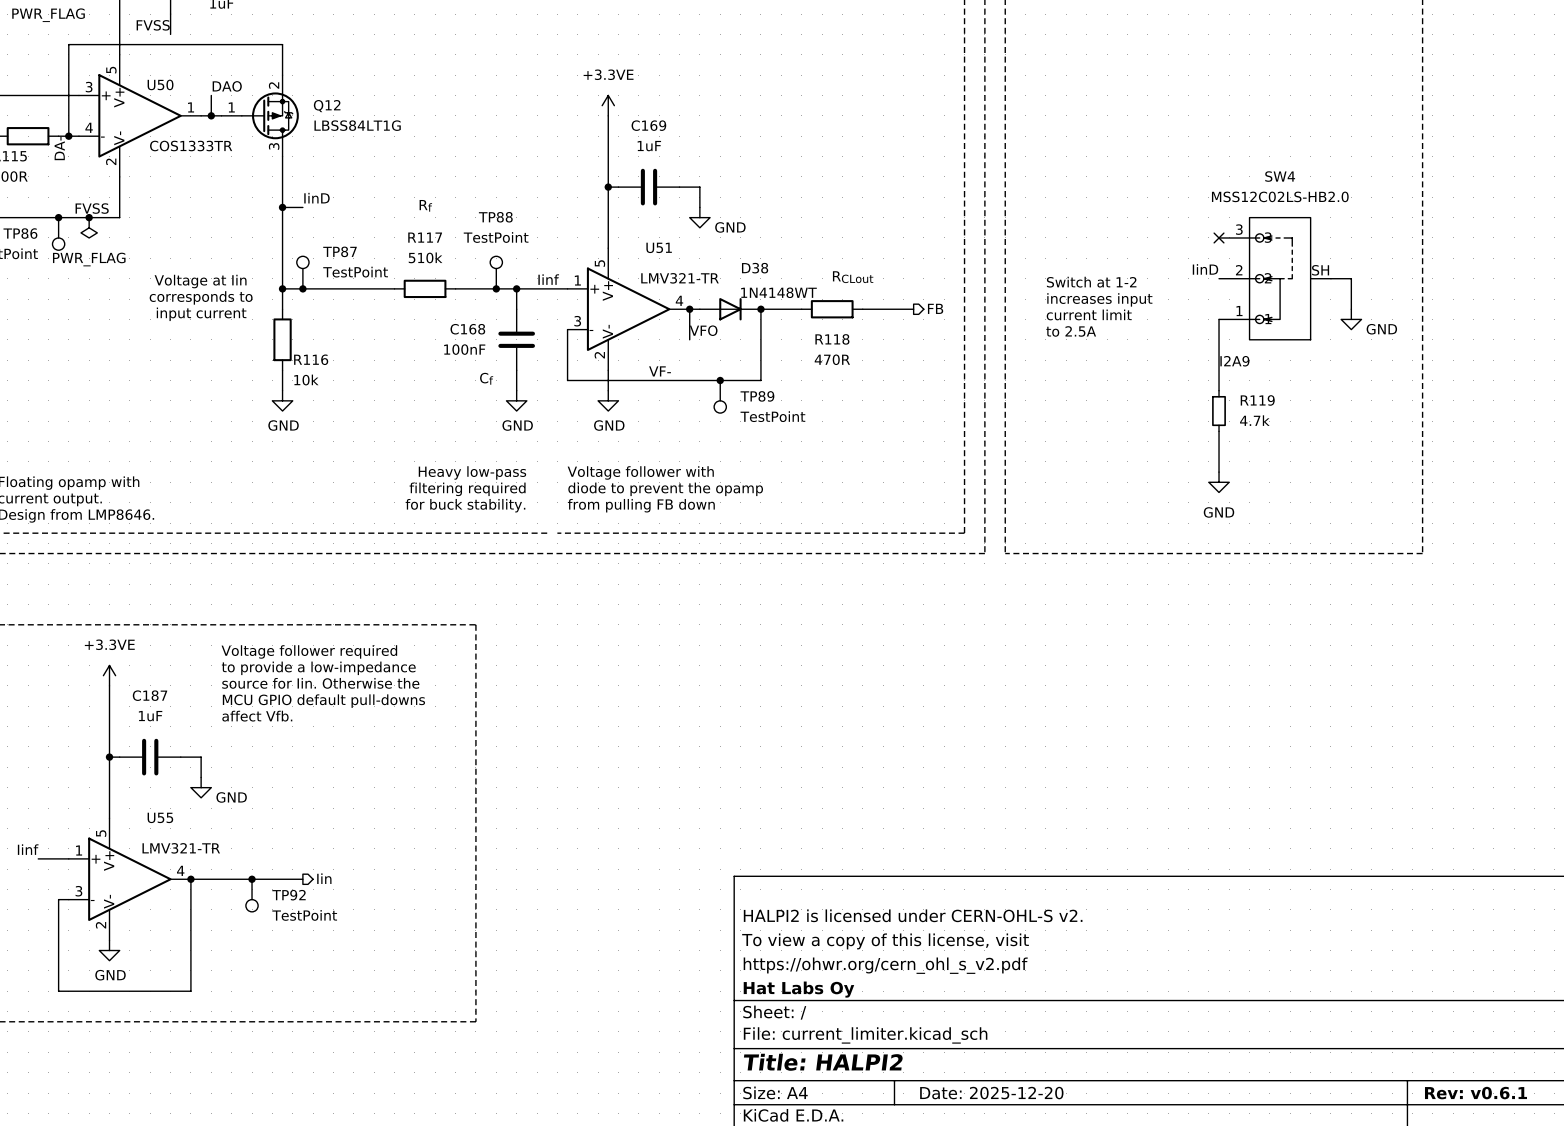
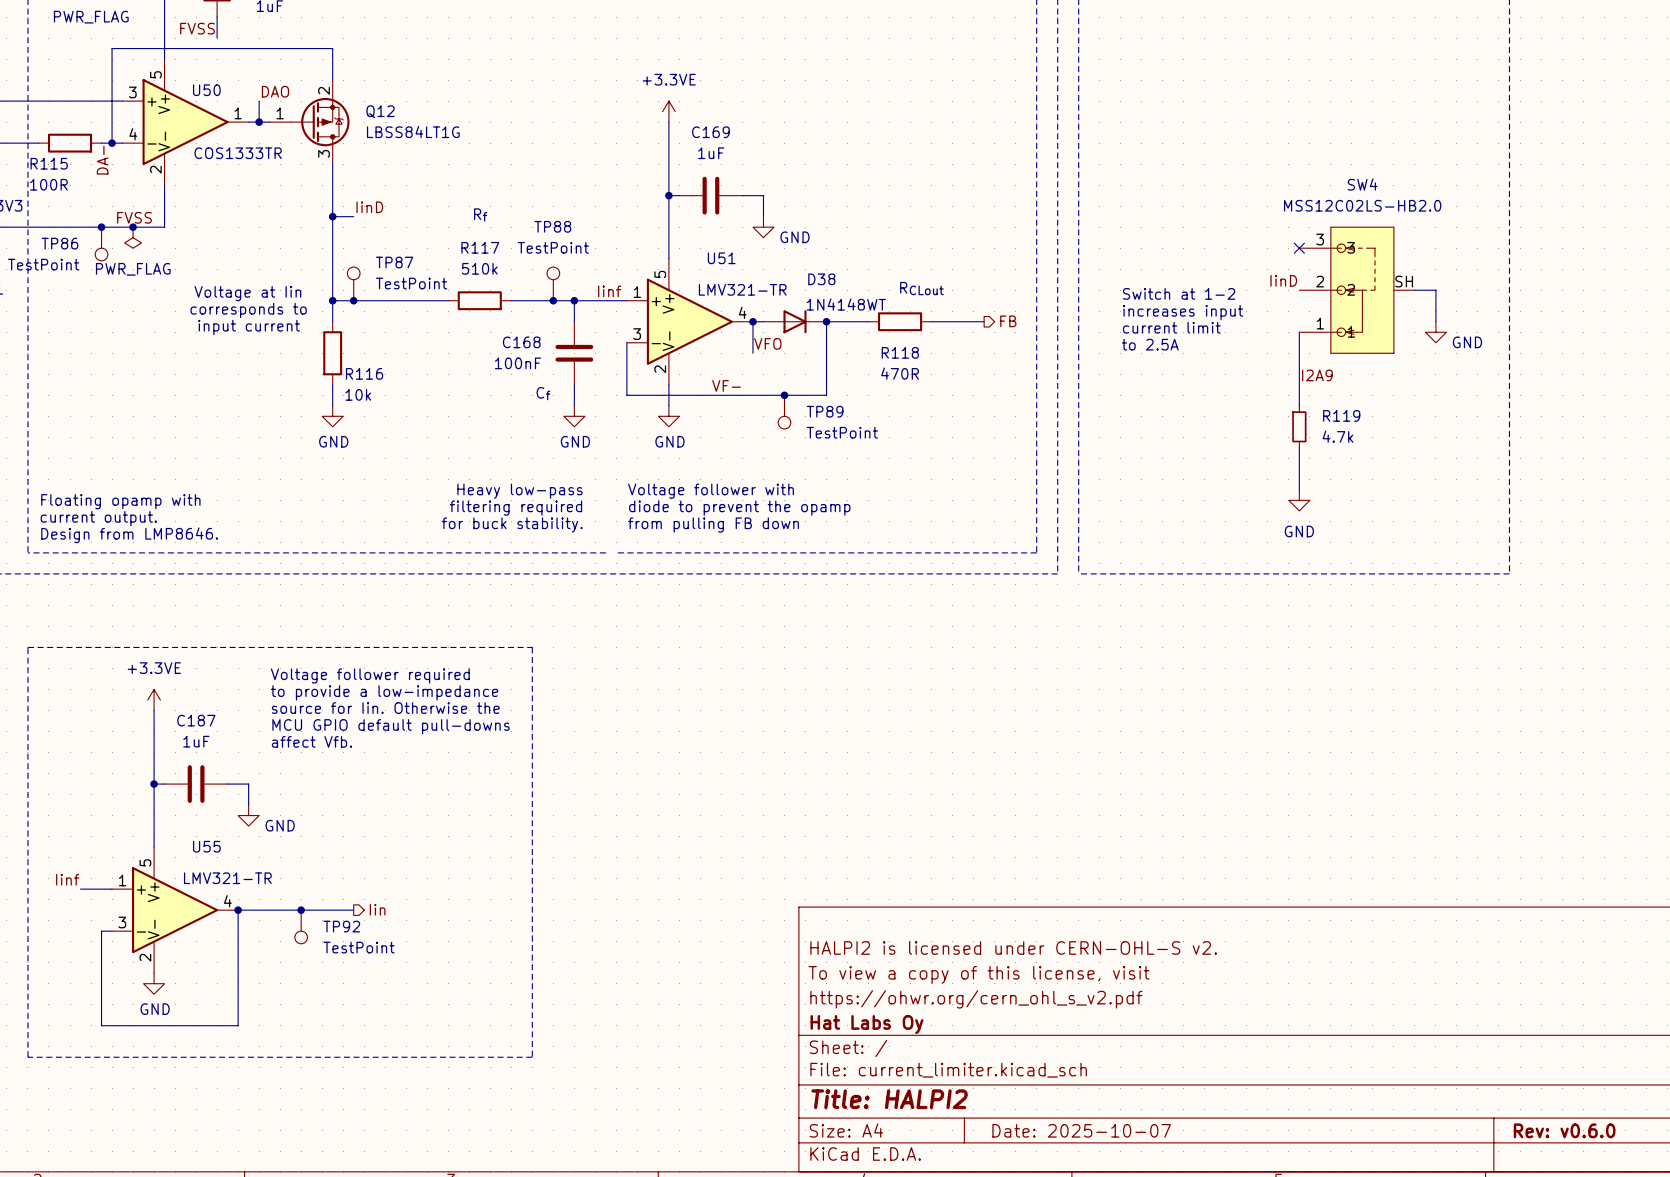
title block: Date: 2025-12-20 (991, 1093) -> Date: 2025-10-07 (1081, 1130)
title block: Rev: v0.6.1 (1475, 1093) -> Rev: v0.6.0 (1564, 1130)

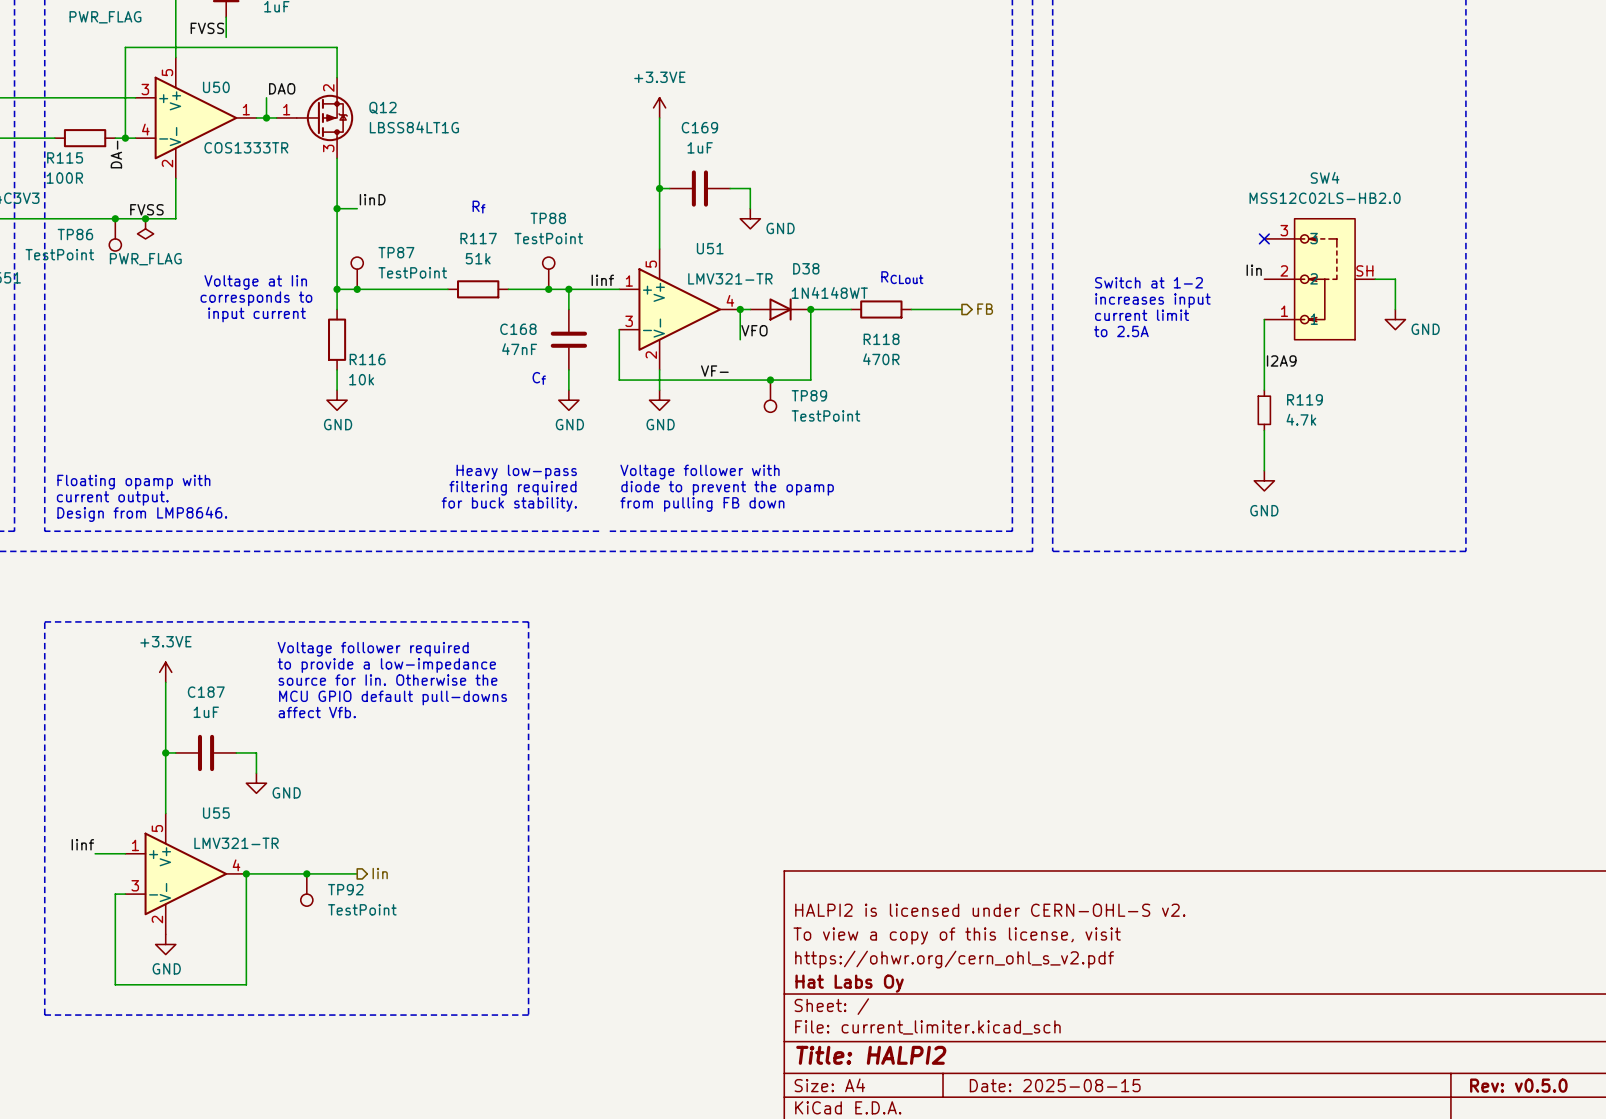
R117 value: 510k (479, 268) -> 51k (478, 258)
label: IinD (1283, 280) -> Iin (1254, 270)
C168 value: 100nF (517, 363) -> 47nF (519, 349)
title block: Date: 2025-10-07 (1081, 1130) -> Date: 2025-08-15 (1055, 1085)
title block: Rev: v0.6.0 (1564, 1130) -> Rev: v0.5.0 (1518, 1085)

